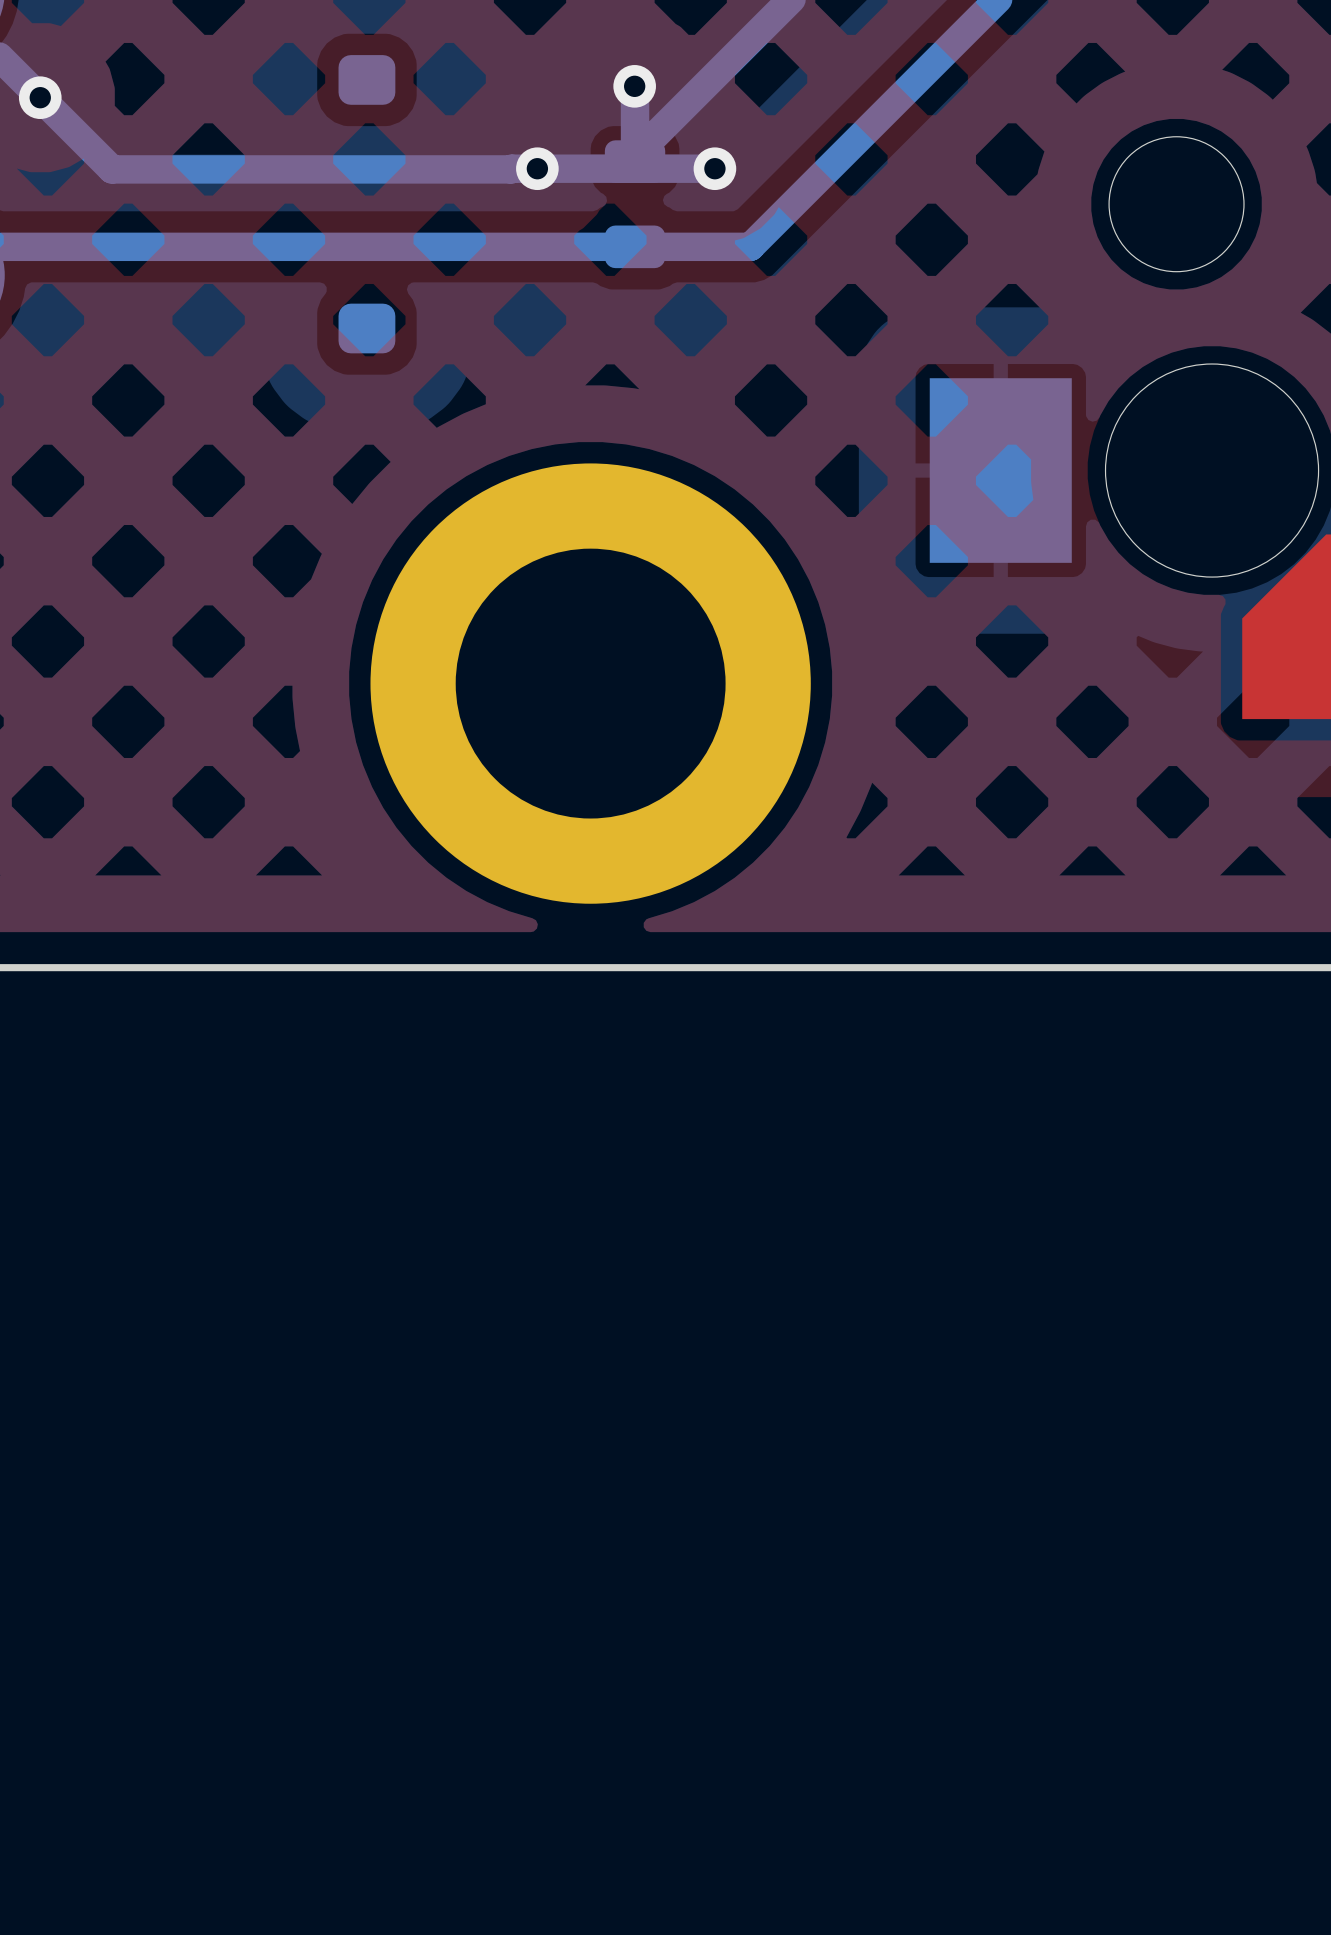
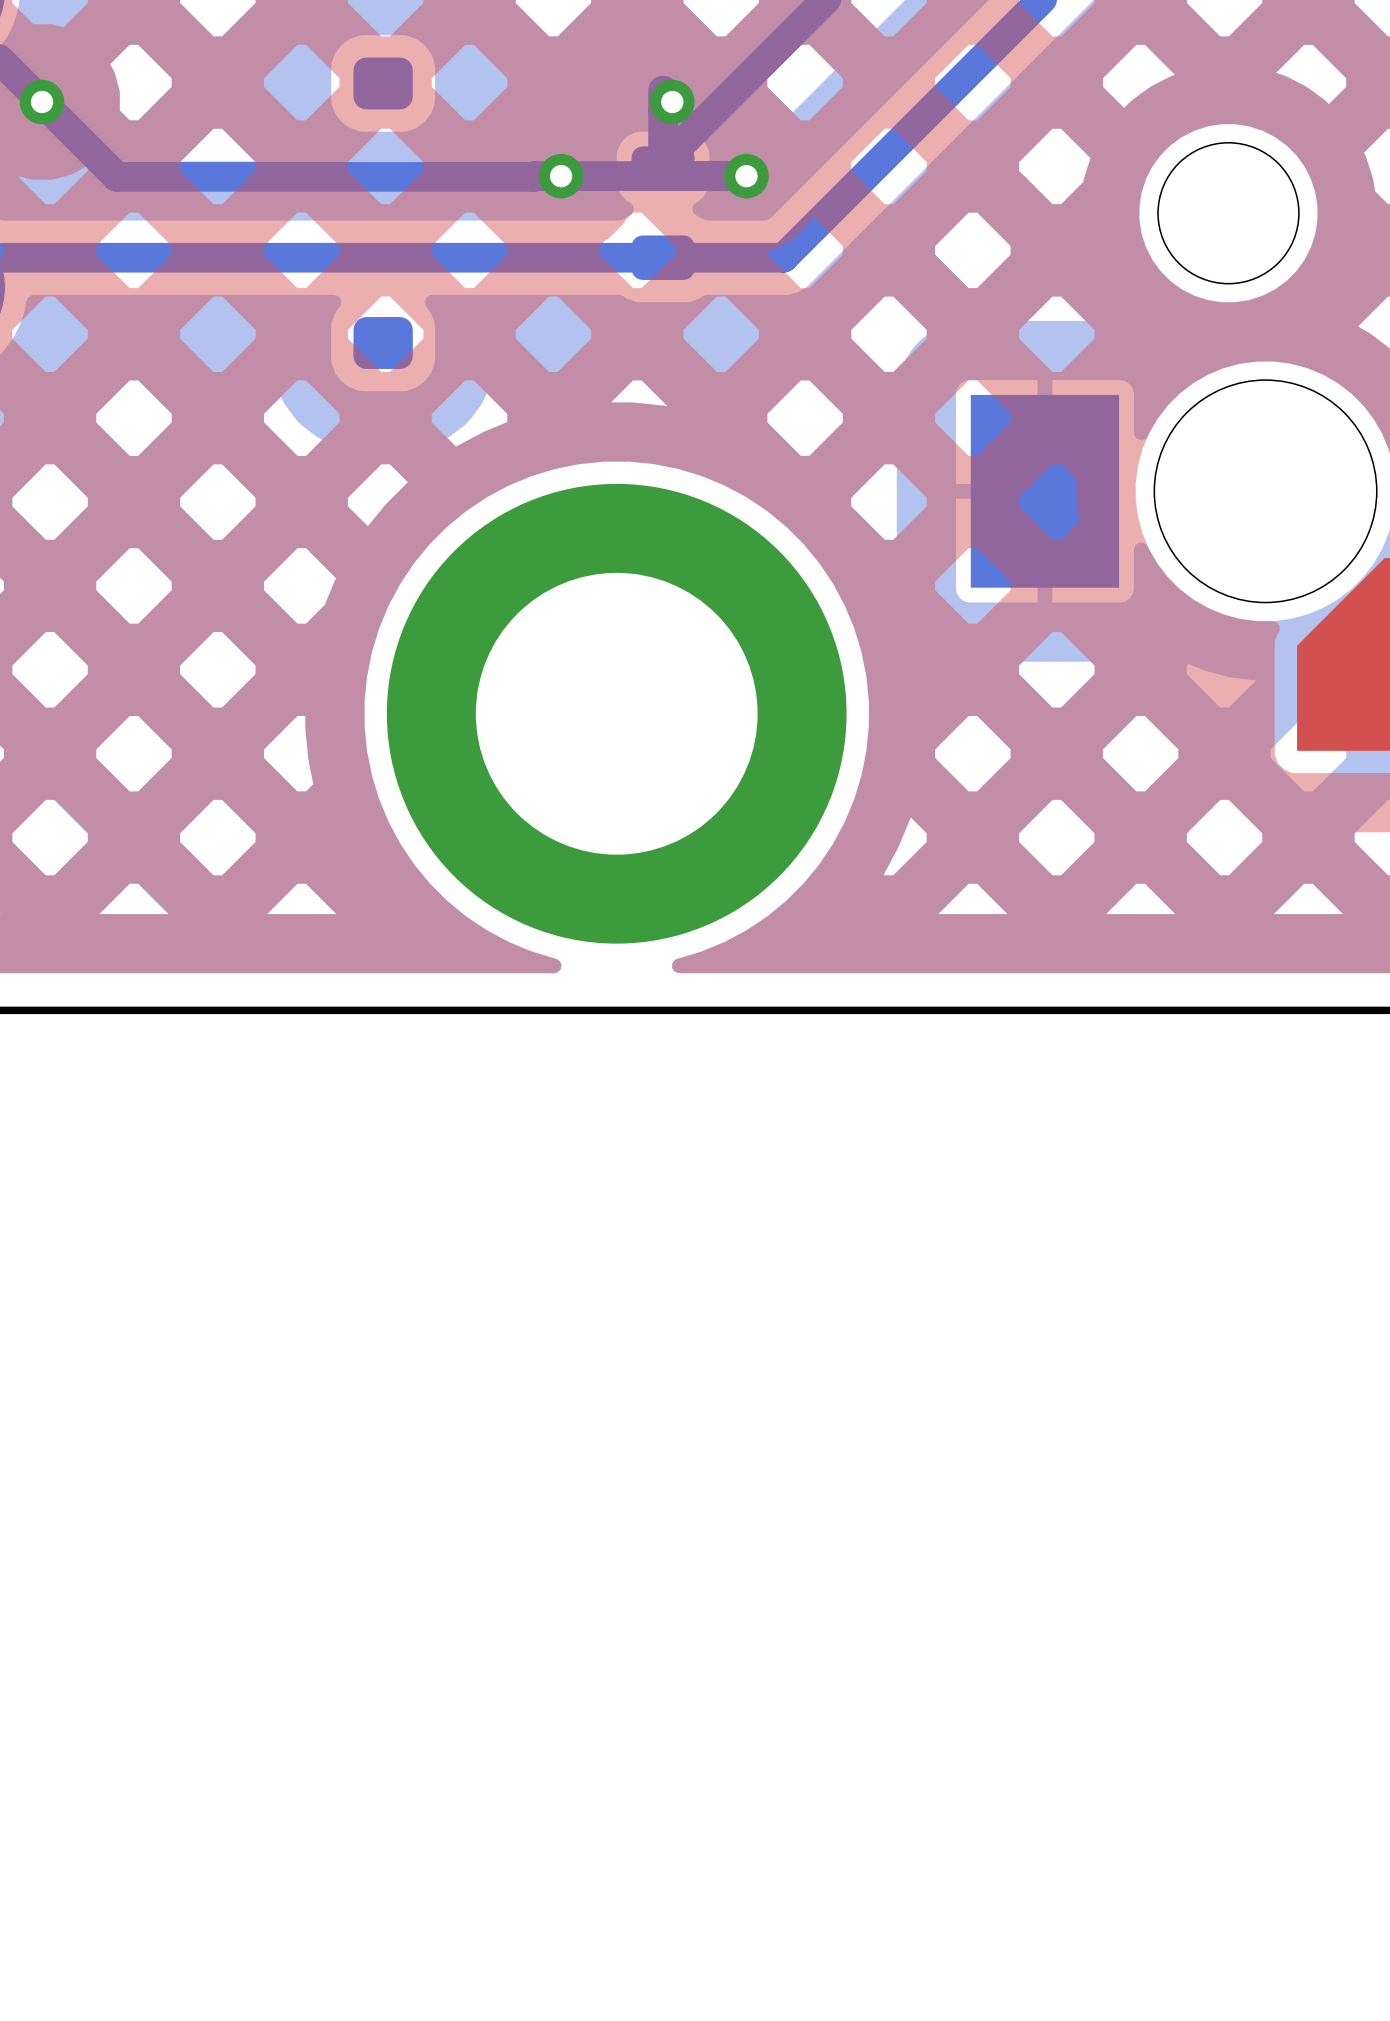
via position: (634, 86) -> (672, 102)

